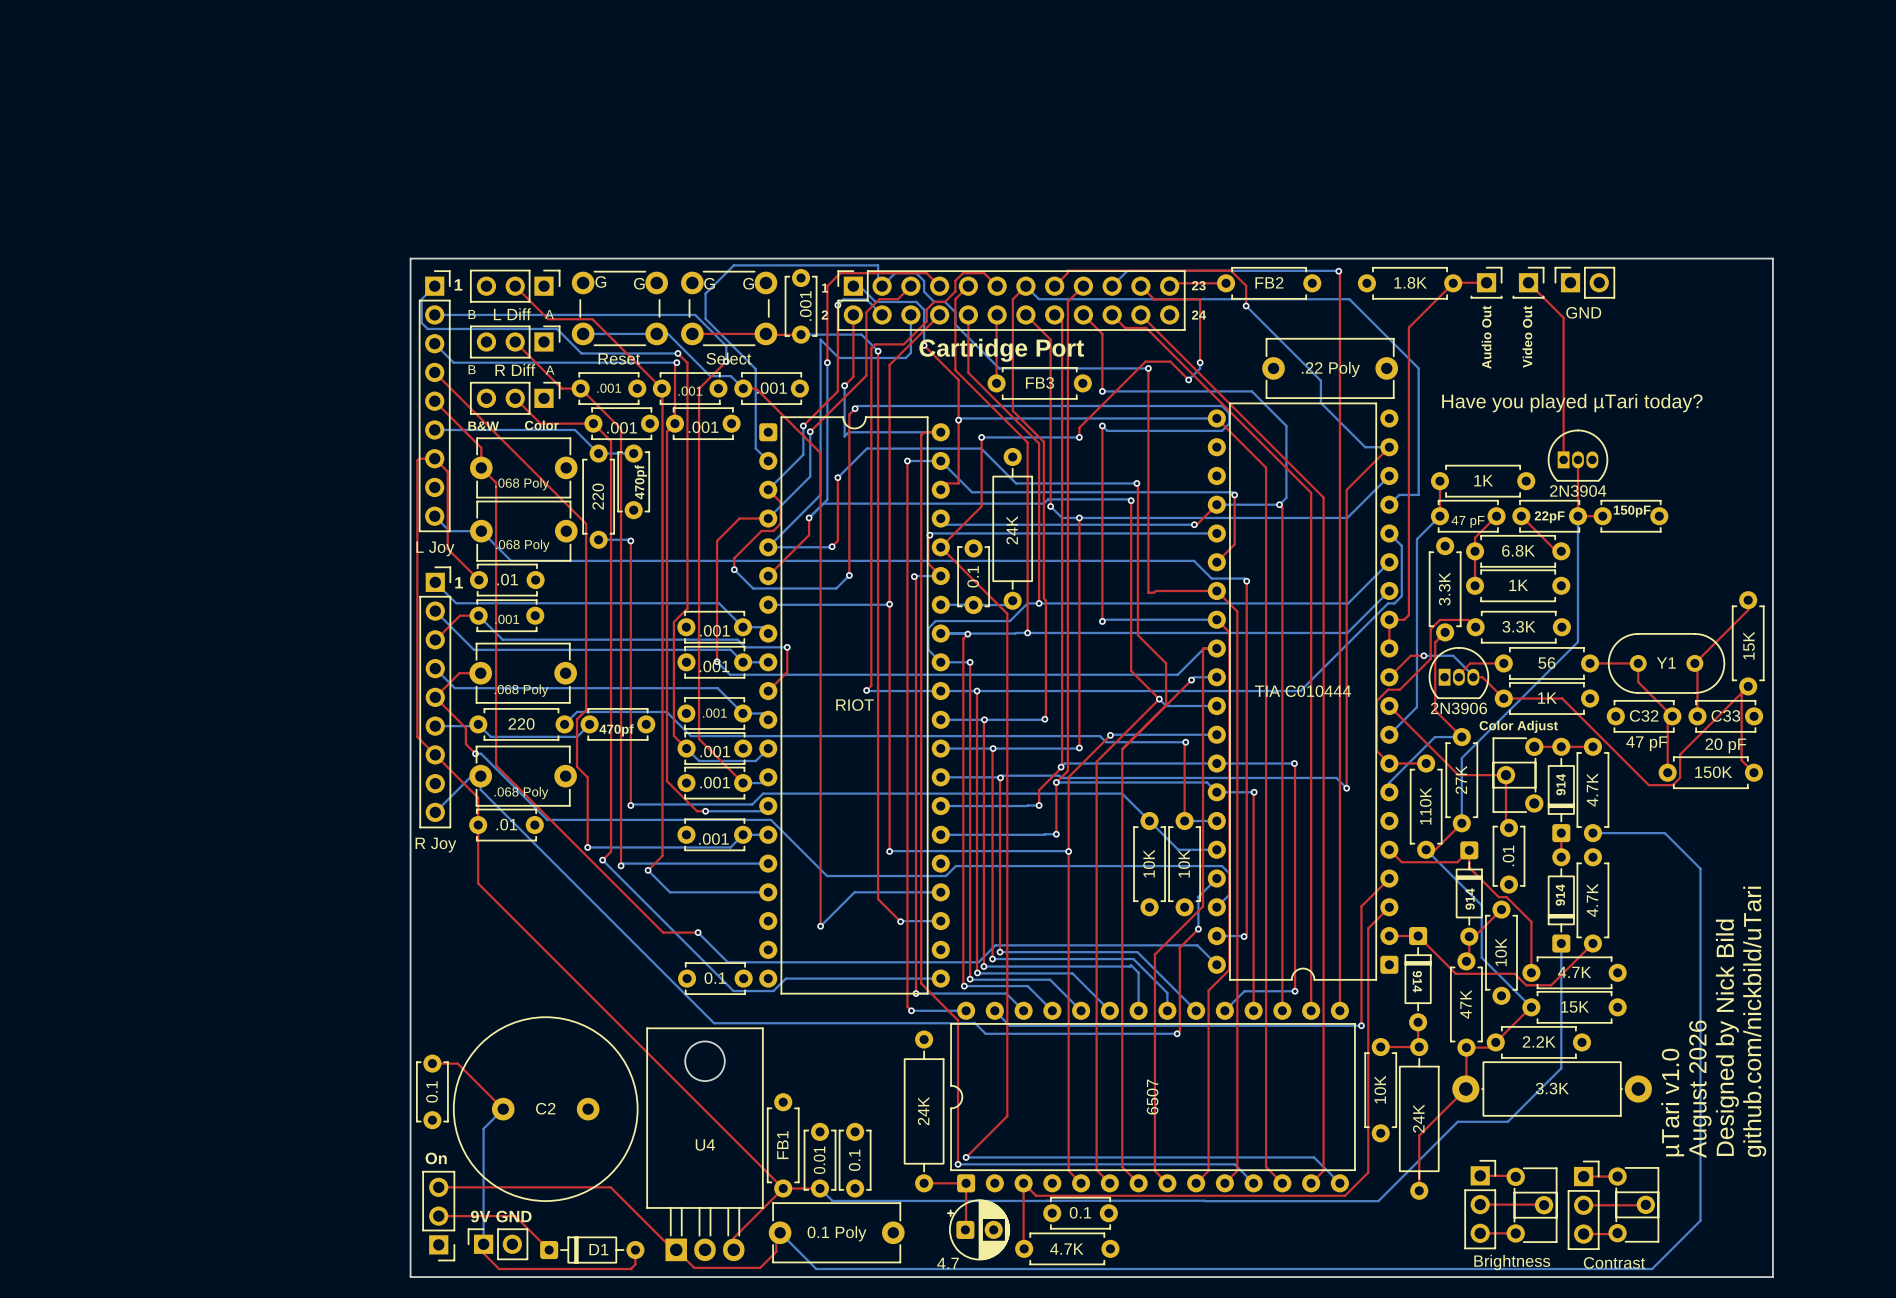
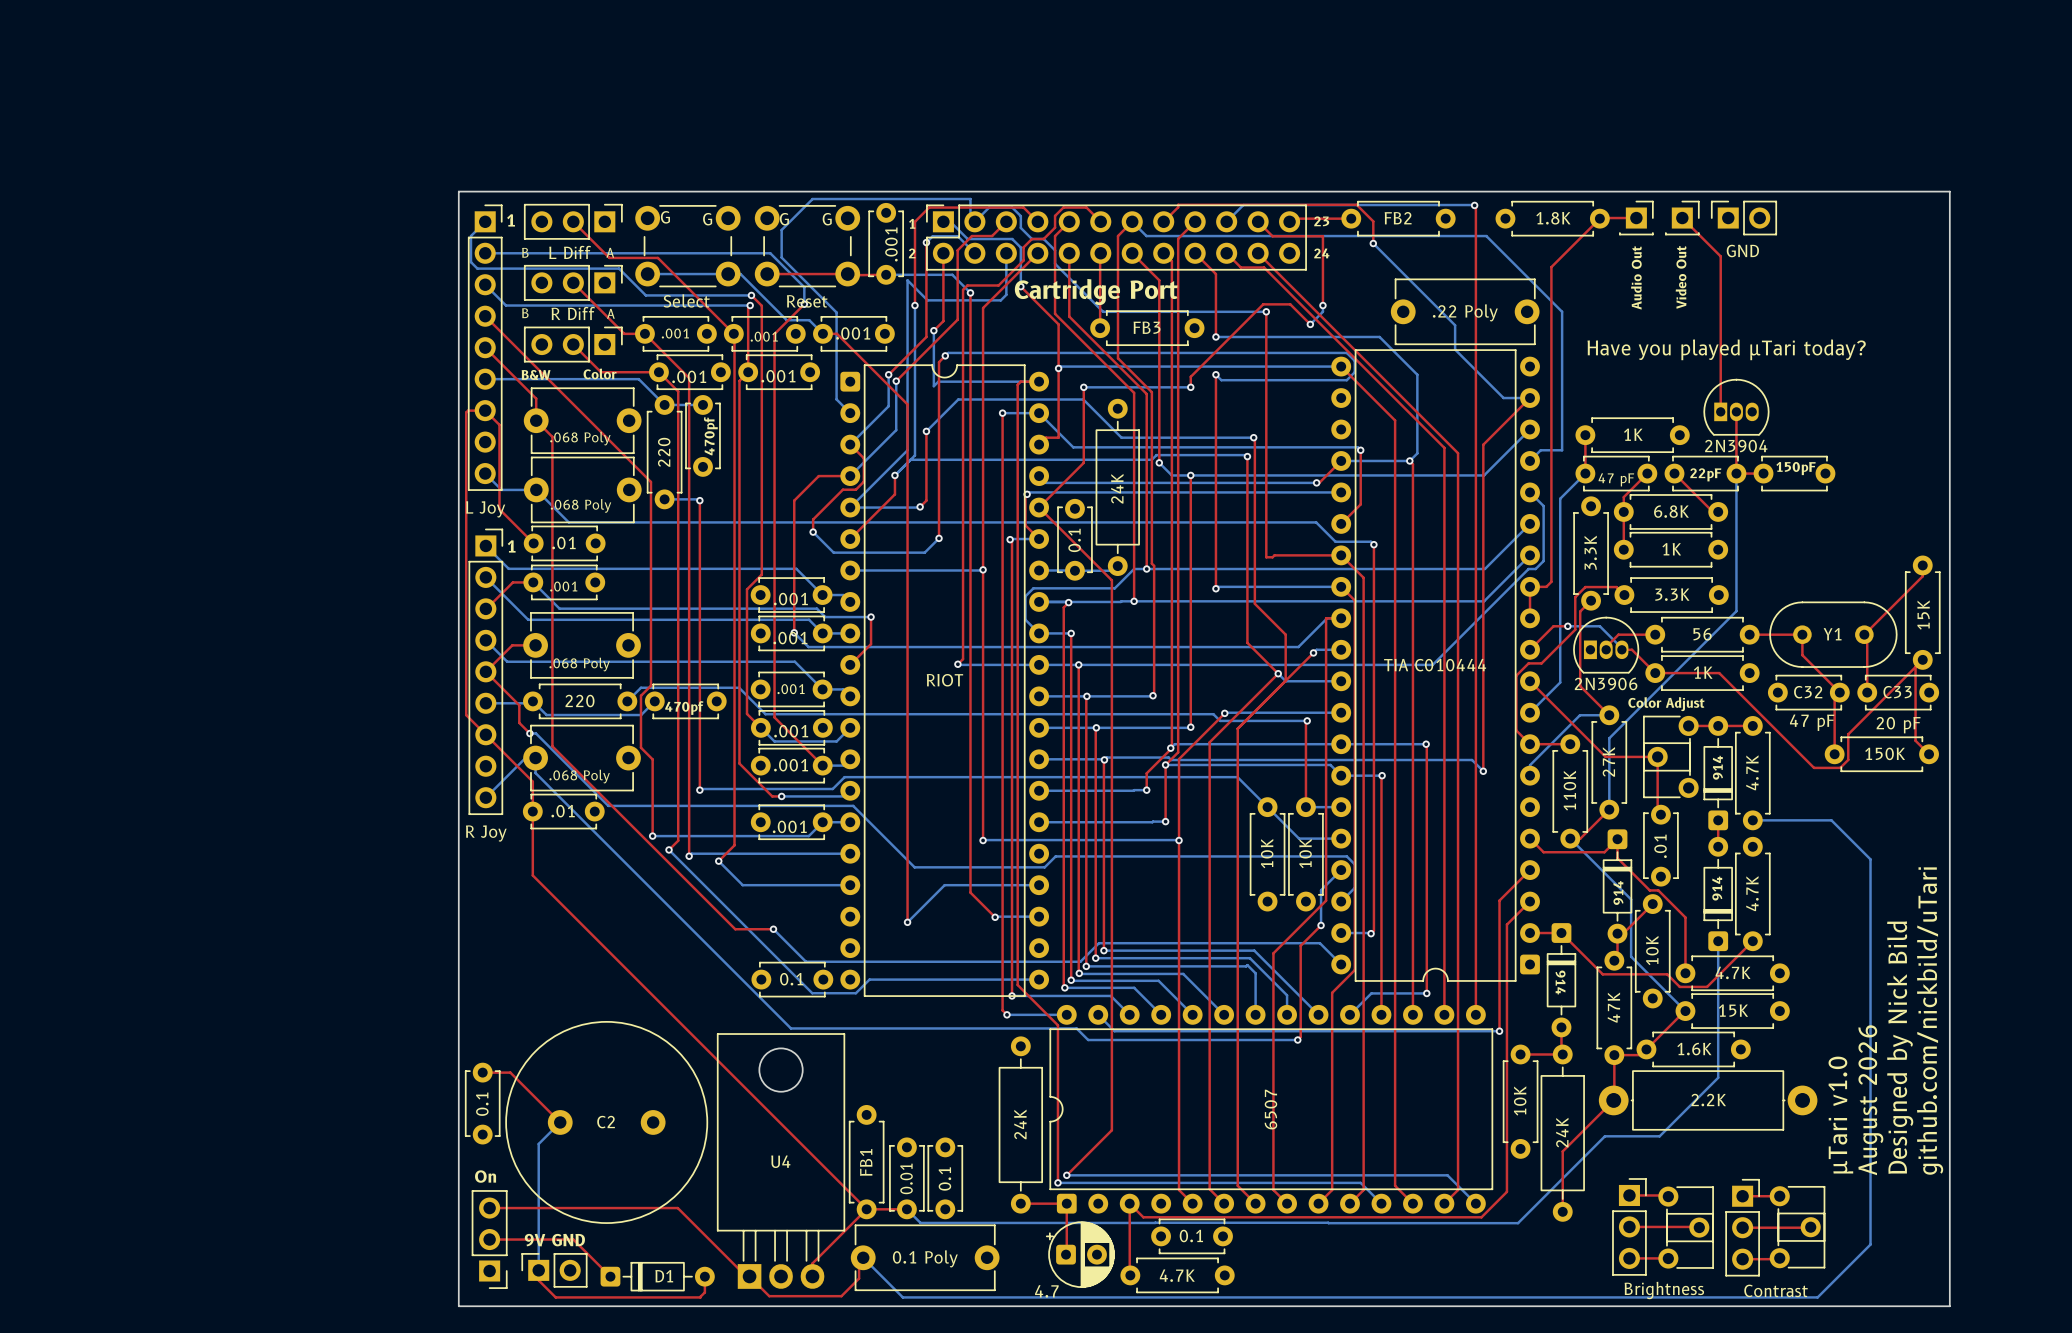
part value: Reset (619, 358) -> Select (686, 300)
part value: Select (728, 358) -> Reset (807, 301)
part value: 2.2K (1539, 1041) -> 1.6K (1694, 1049)
part value: 3.3K (1552, 1088) -> 2.2K (1708, 1100)

